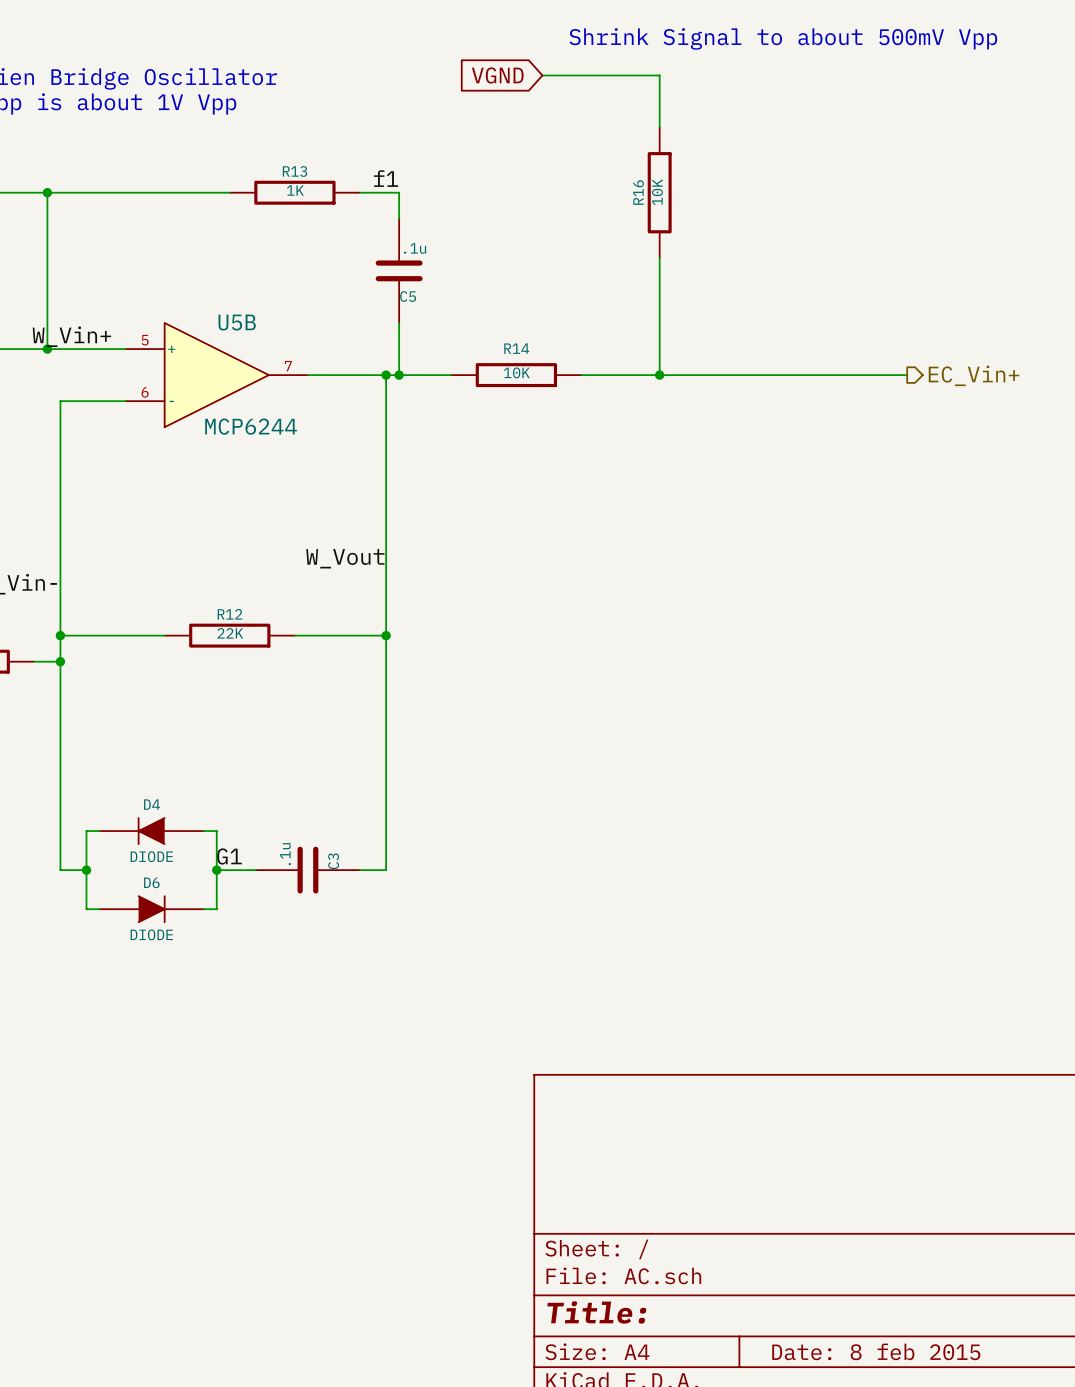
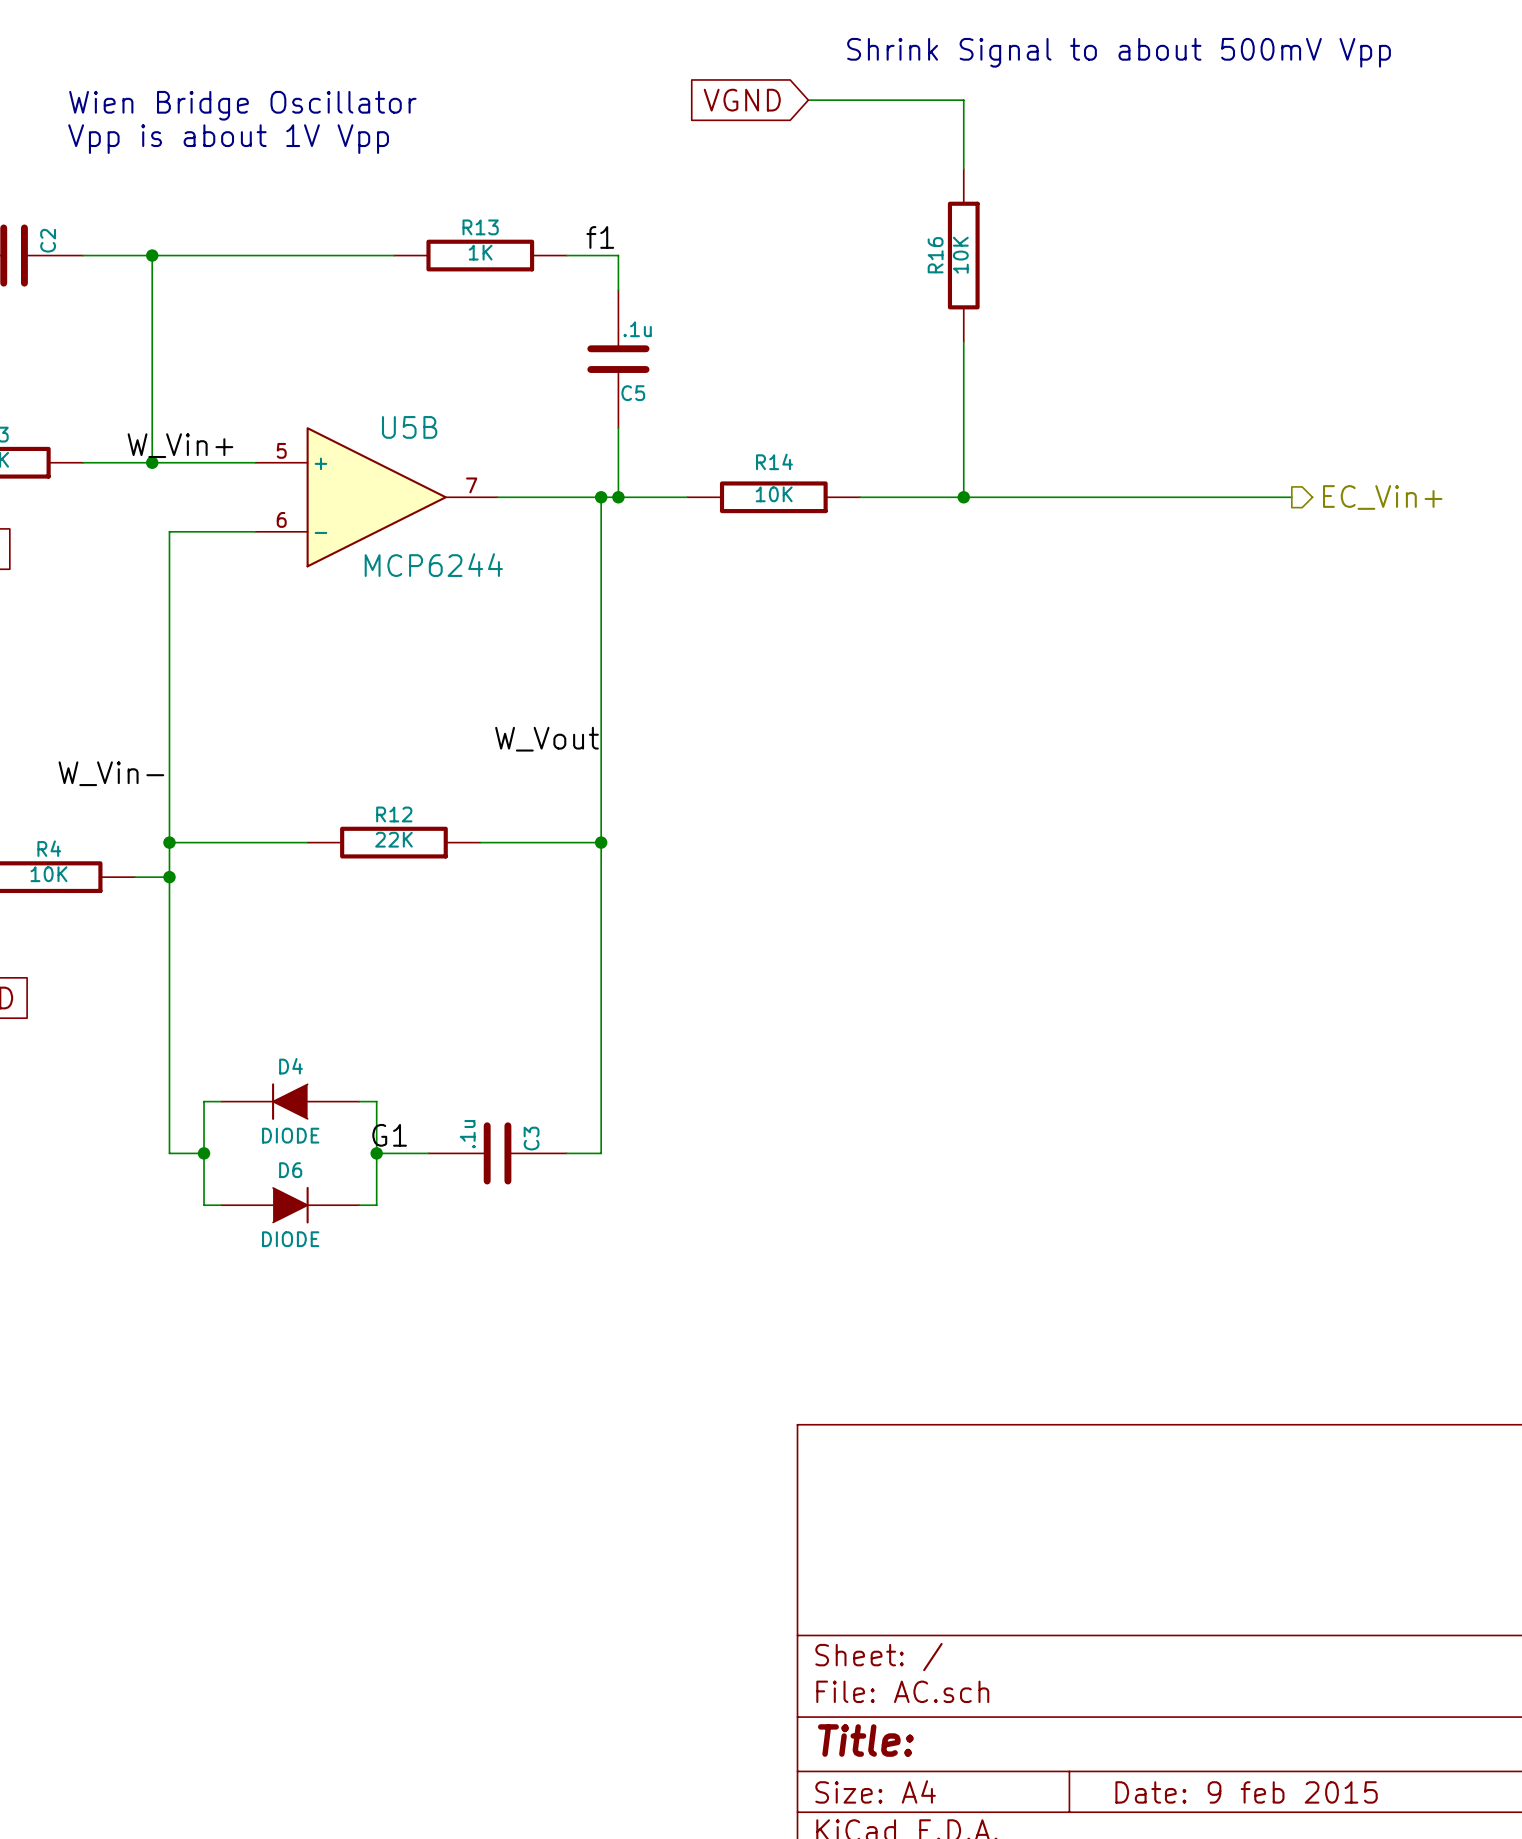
title block: Date: 8 feb 2015 (876, 1351) -> Date: 9 feb 2015 (1246, 1792)

